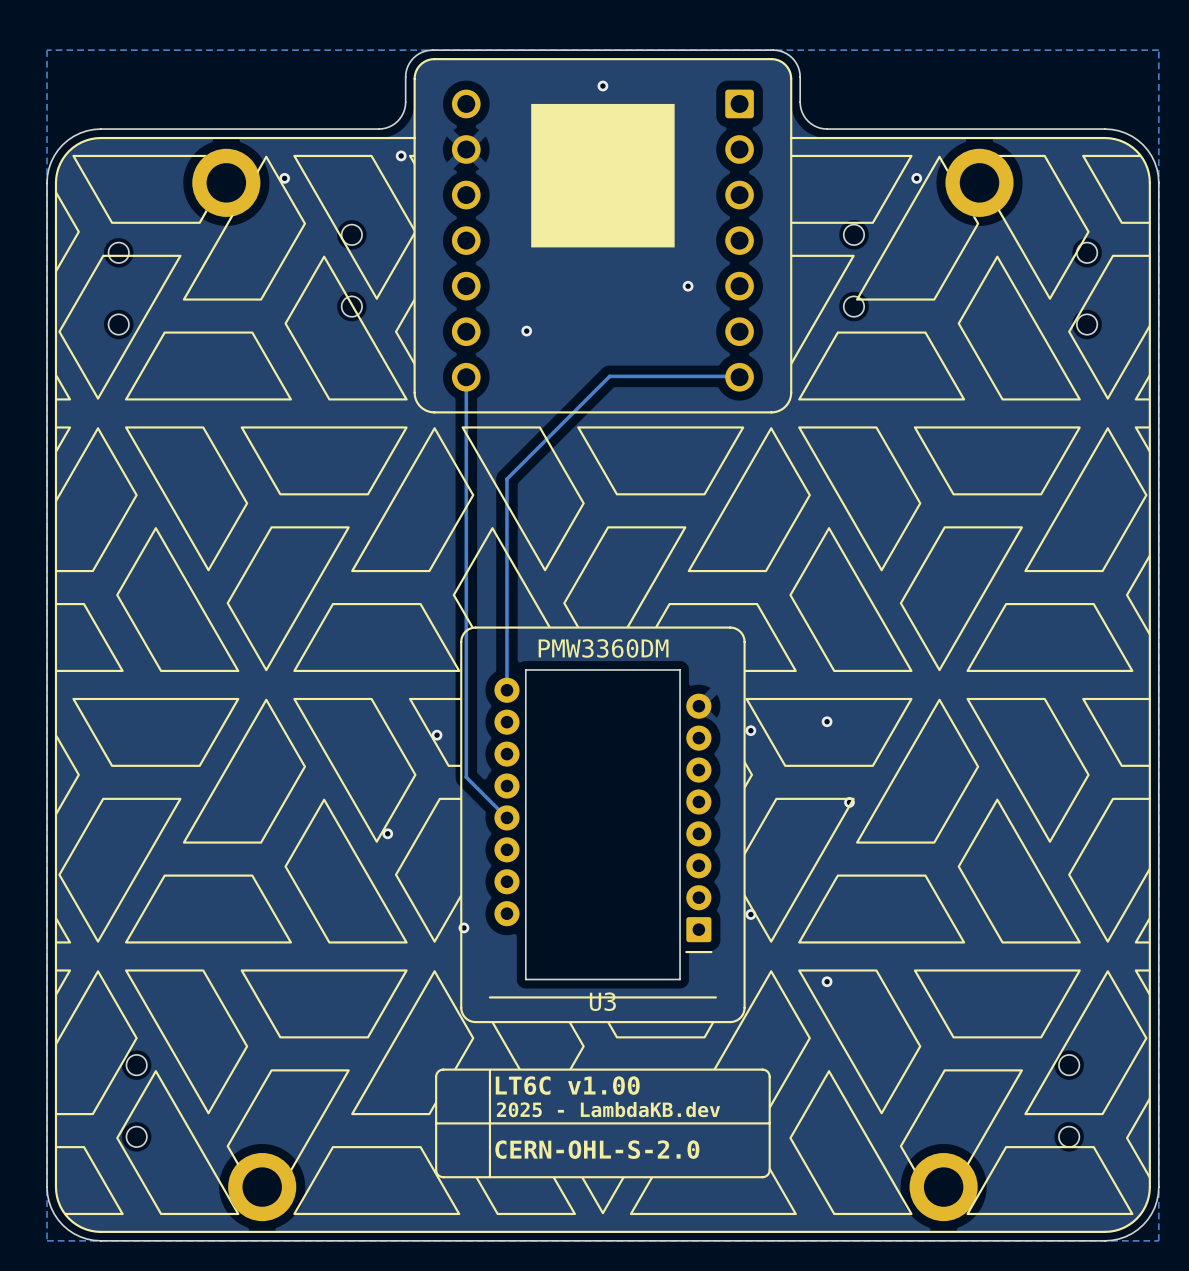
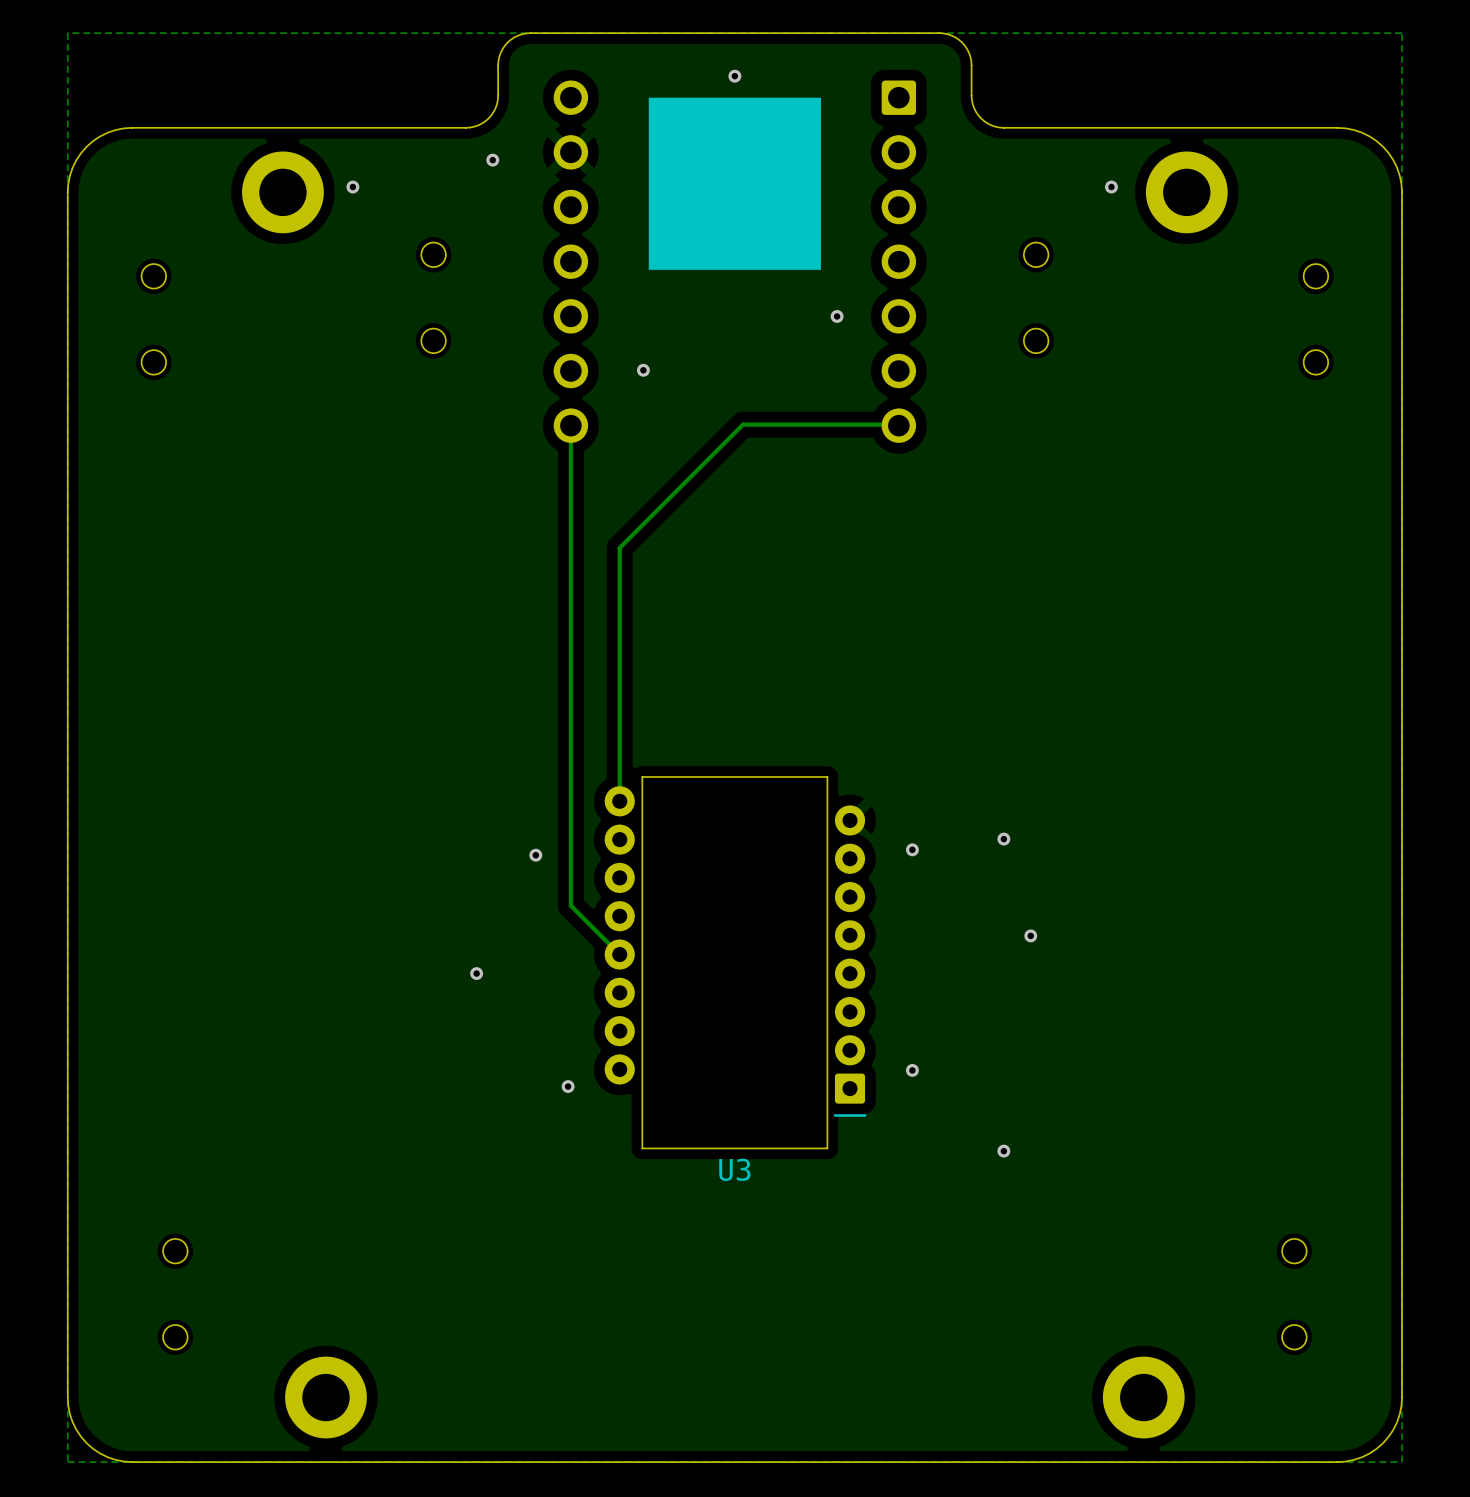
line: (771, 59) (434, 59) (426, 60) (420, 64) (416, 71) (414, 78) (414, 392) (416, 400) (420, 406) (426, 410) (434, 412) (771, 412) (779, 410) (785, 406) (789, 400) (791, 392) (791, 78) (789, 71) (785, 64) (779, 60) (771, 59) -> none
line: (791, 138) (1110, 138) (1119, 140) (1132, 147) (1140, 154) (1147, 168) (1149, 182) (1149, 1187) (1148, 1197) (1142, 1210) (1132, 1222) (1119, 1229) (1105, 1231) (100, 1231) (86, 1229) (76, 1225) (62, 1210) (57, 1197) (55, 1187) (55, 182) (58, 168) (65, 154) (72, 147) (86, 140) (95, 138) (414, 138) -> none
drawing: [55, 154, 415, 401] -> none
drawing: [791, 154, 1150, 401] -> none
drawing: [55, 426, 1150, 673] -> none
line: (730, 627) (475, 627) (464, 633) (461, 641) (461, 1007) (466, 1019) (475, 1022) (730, 1022) (741, 1016) (744, 1007) (744, 641) (740, 631) (730, 627) -> none
text: PMW3360DM (603, 648) -> none
U3 footprint: [488, 669, 717, 999] -> [604, 776, 867, 1149]
drawing: [55, 697, 462, 944] -> none
drawing: [744, 697, 1150, 944] -> none
drawing: [55, 969, 1150, 1216] -> none
drawing: [568, 1022, 585, 1070] -> none
line: (762, 1069) (441, 1069) (436, 1076) (436, 1172) (443, 1177) (764, 1176) (769, 1170) (769, 1076) (767, 1071) (762, 1069) -> none
line: (489, 1071) (489, 1177) -> none
text: LT6C v1.00 (567, 1085) -> none
text: 2025 - LambdaKB.dev (608, 1109) -> none
line: (769, 1123) (436, 1123) -> none
text: CERN-OHL-S-2.0 (597, 1149) -> none

